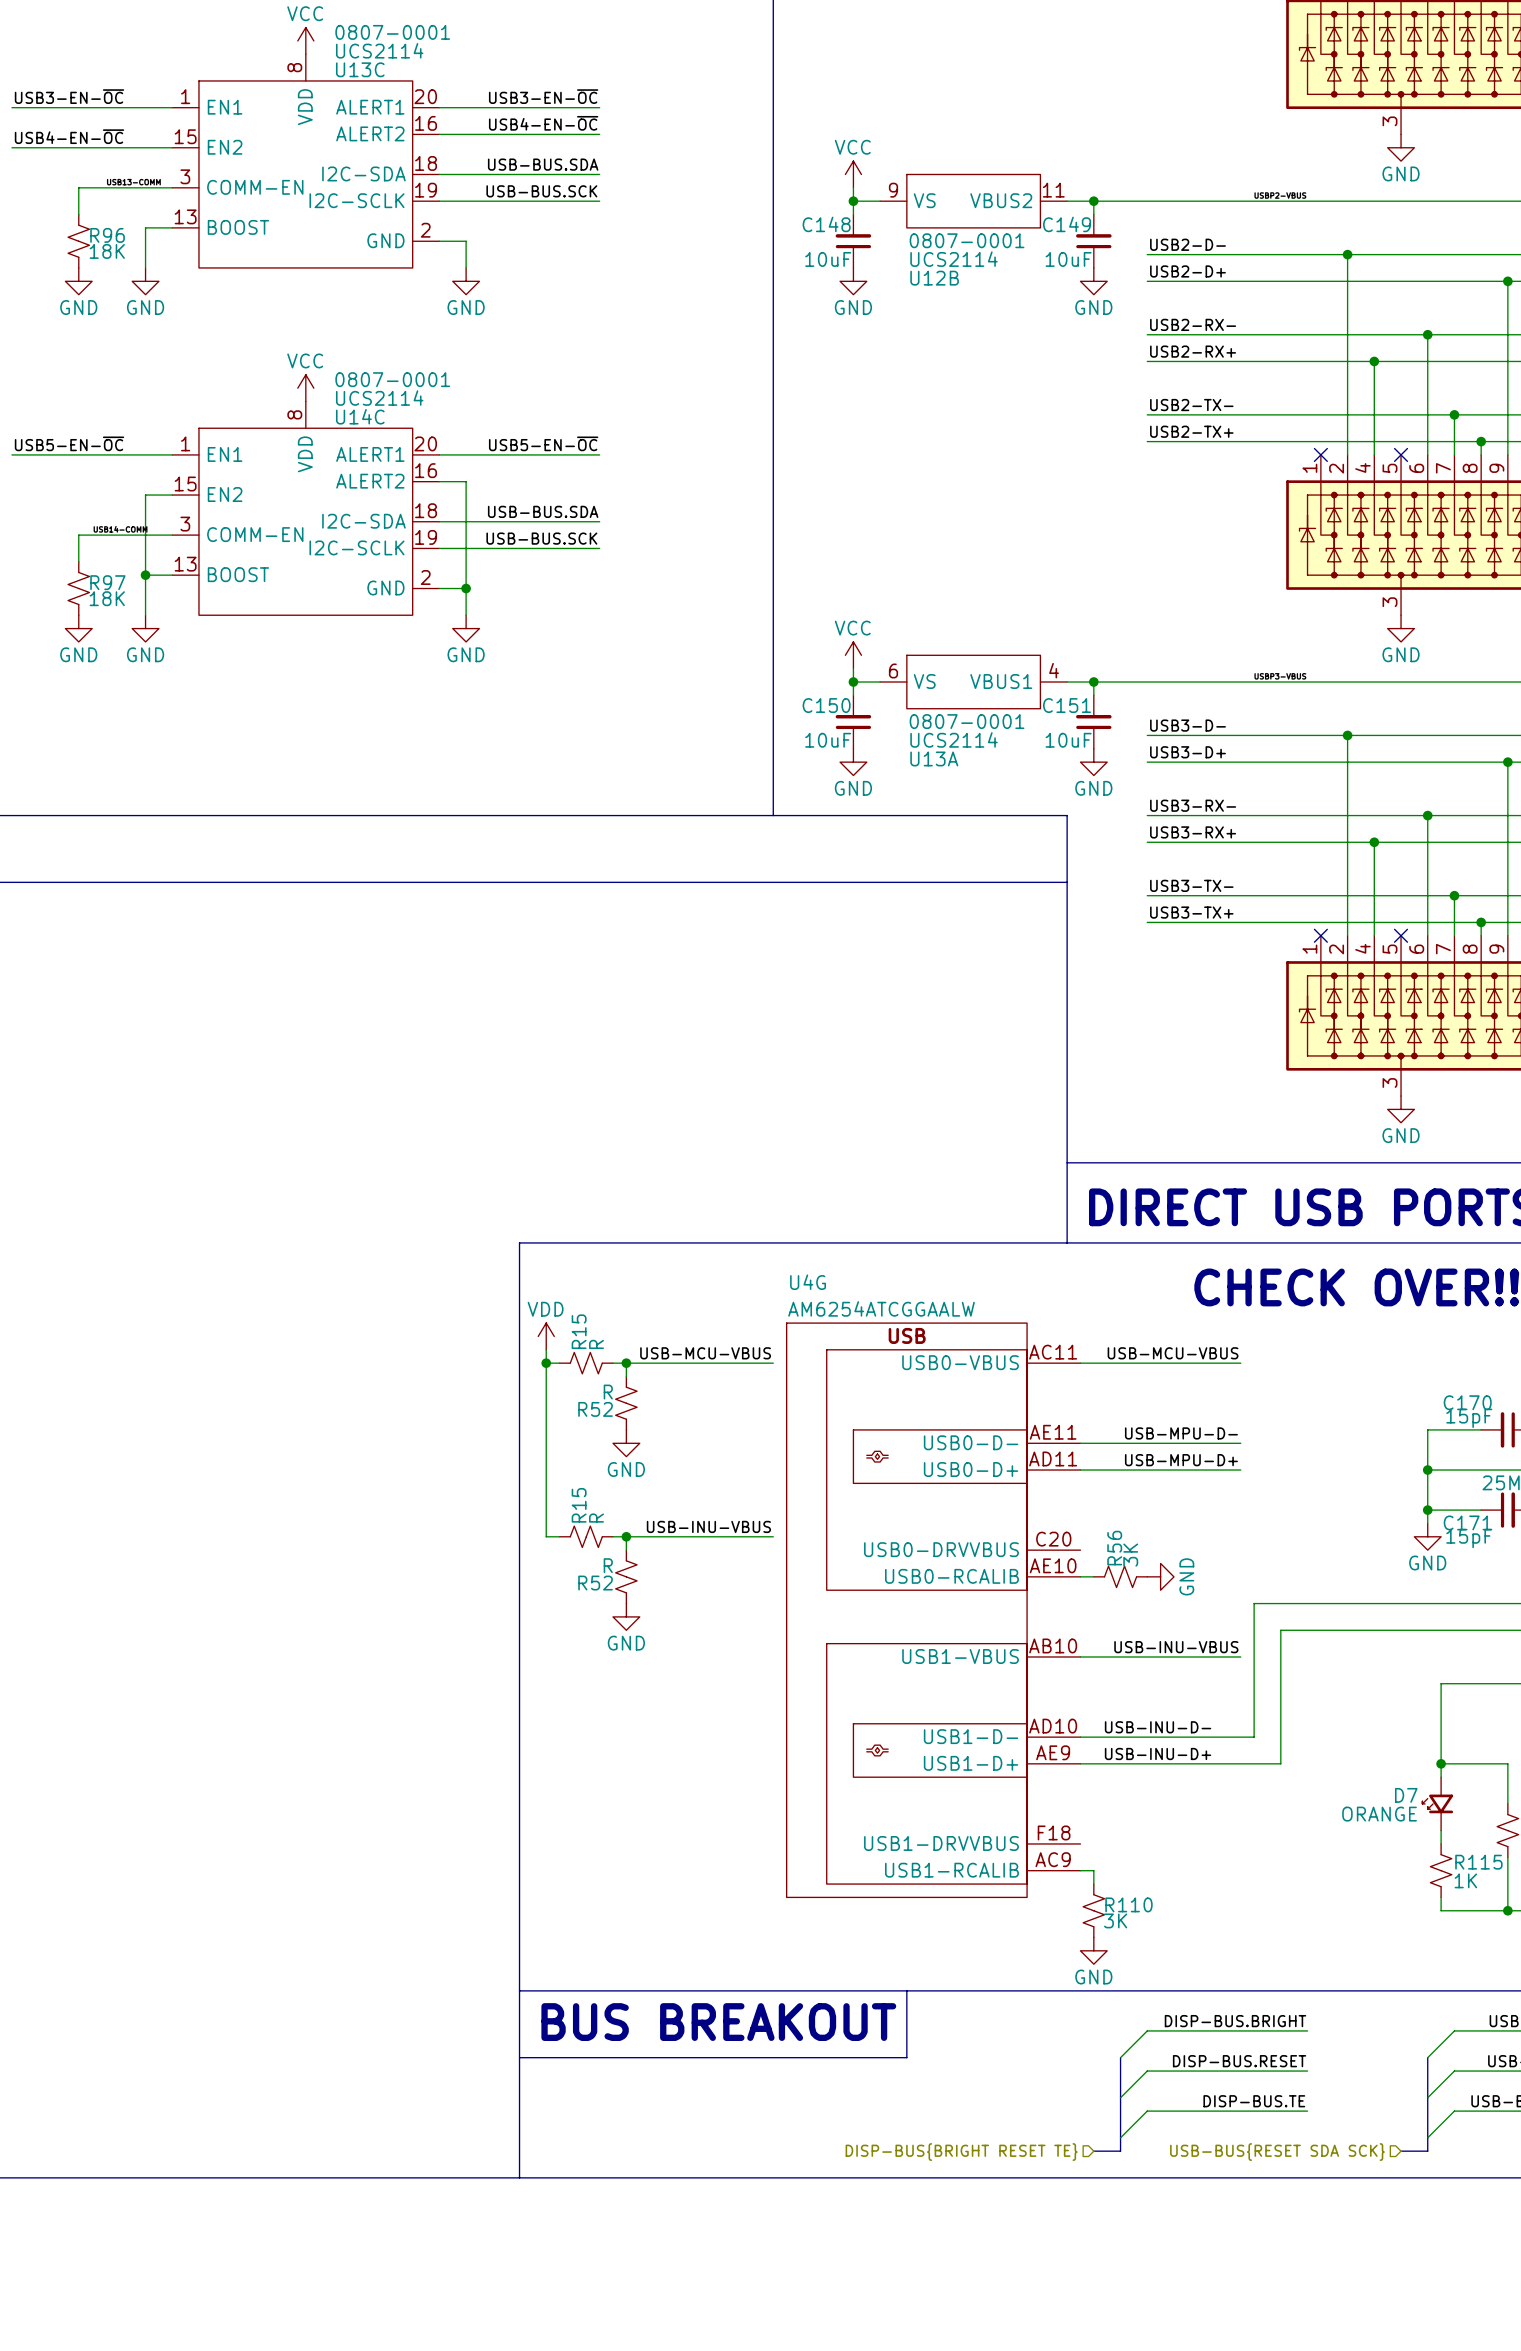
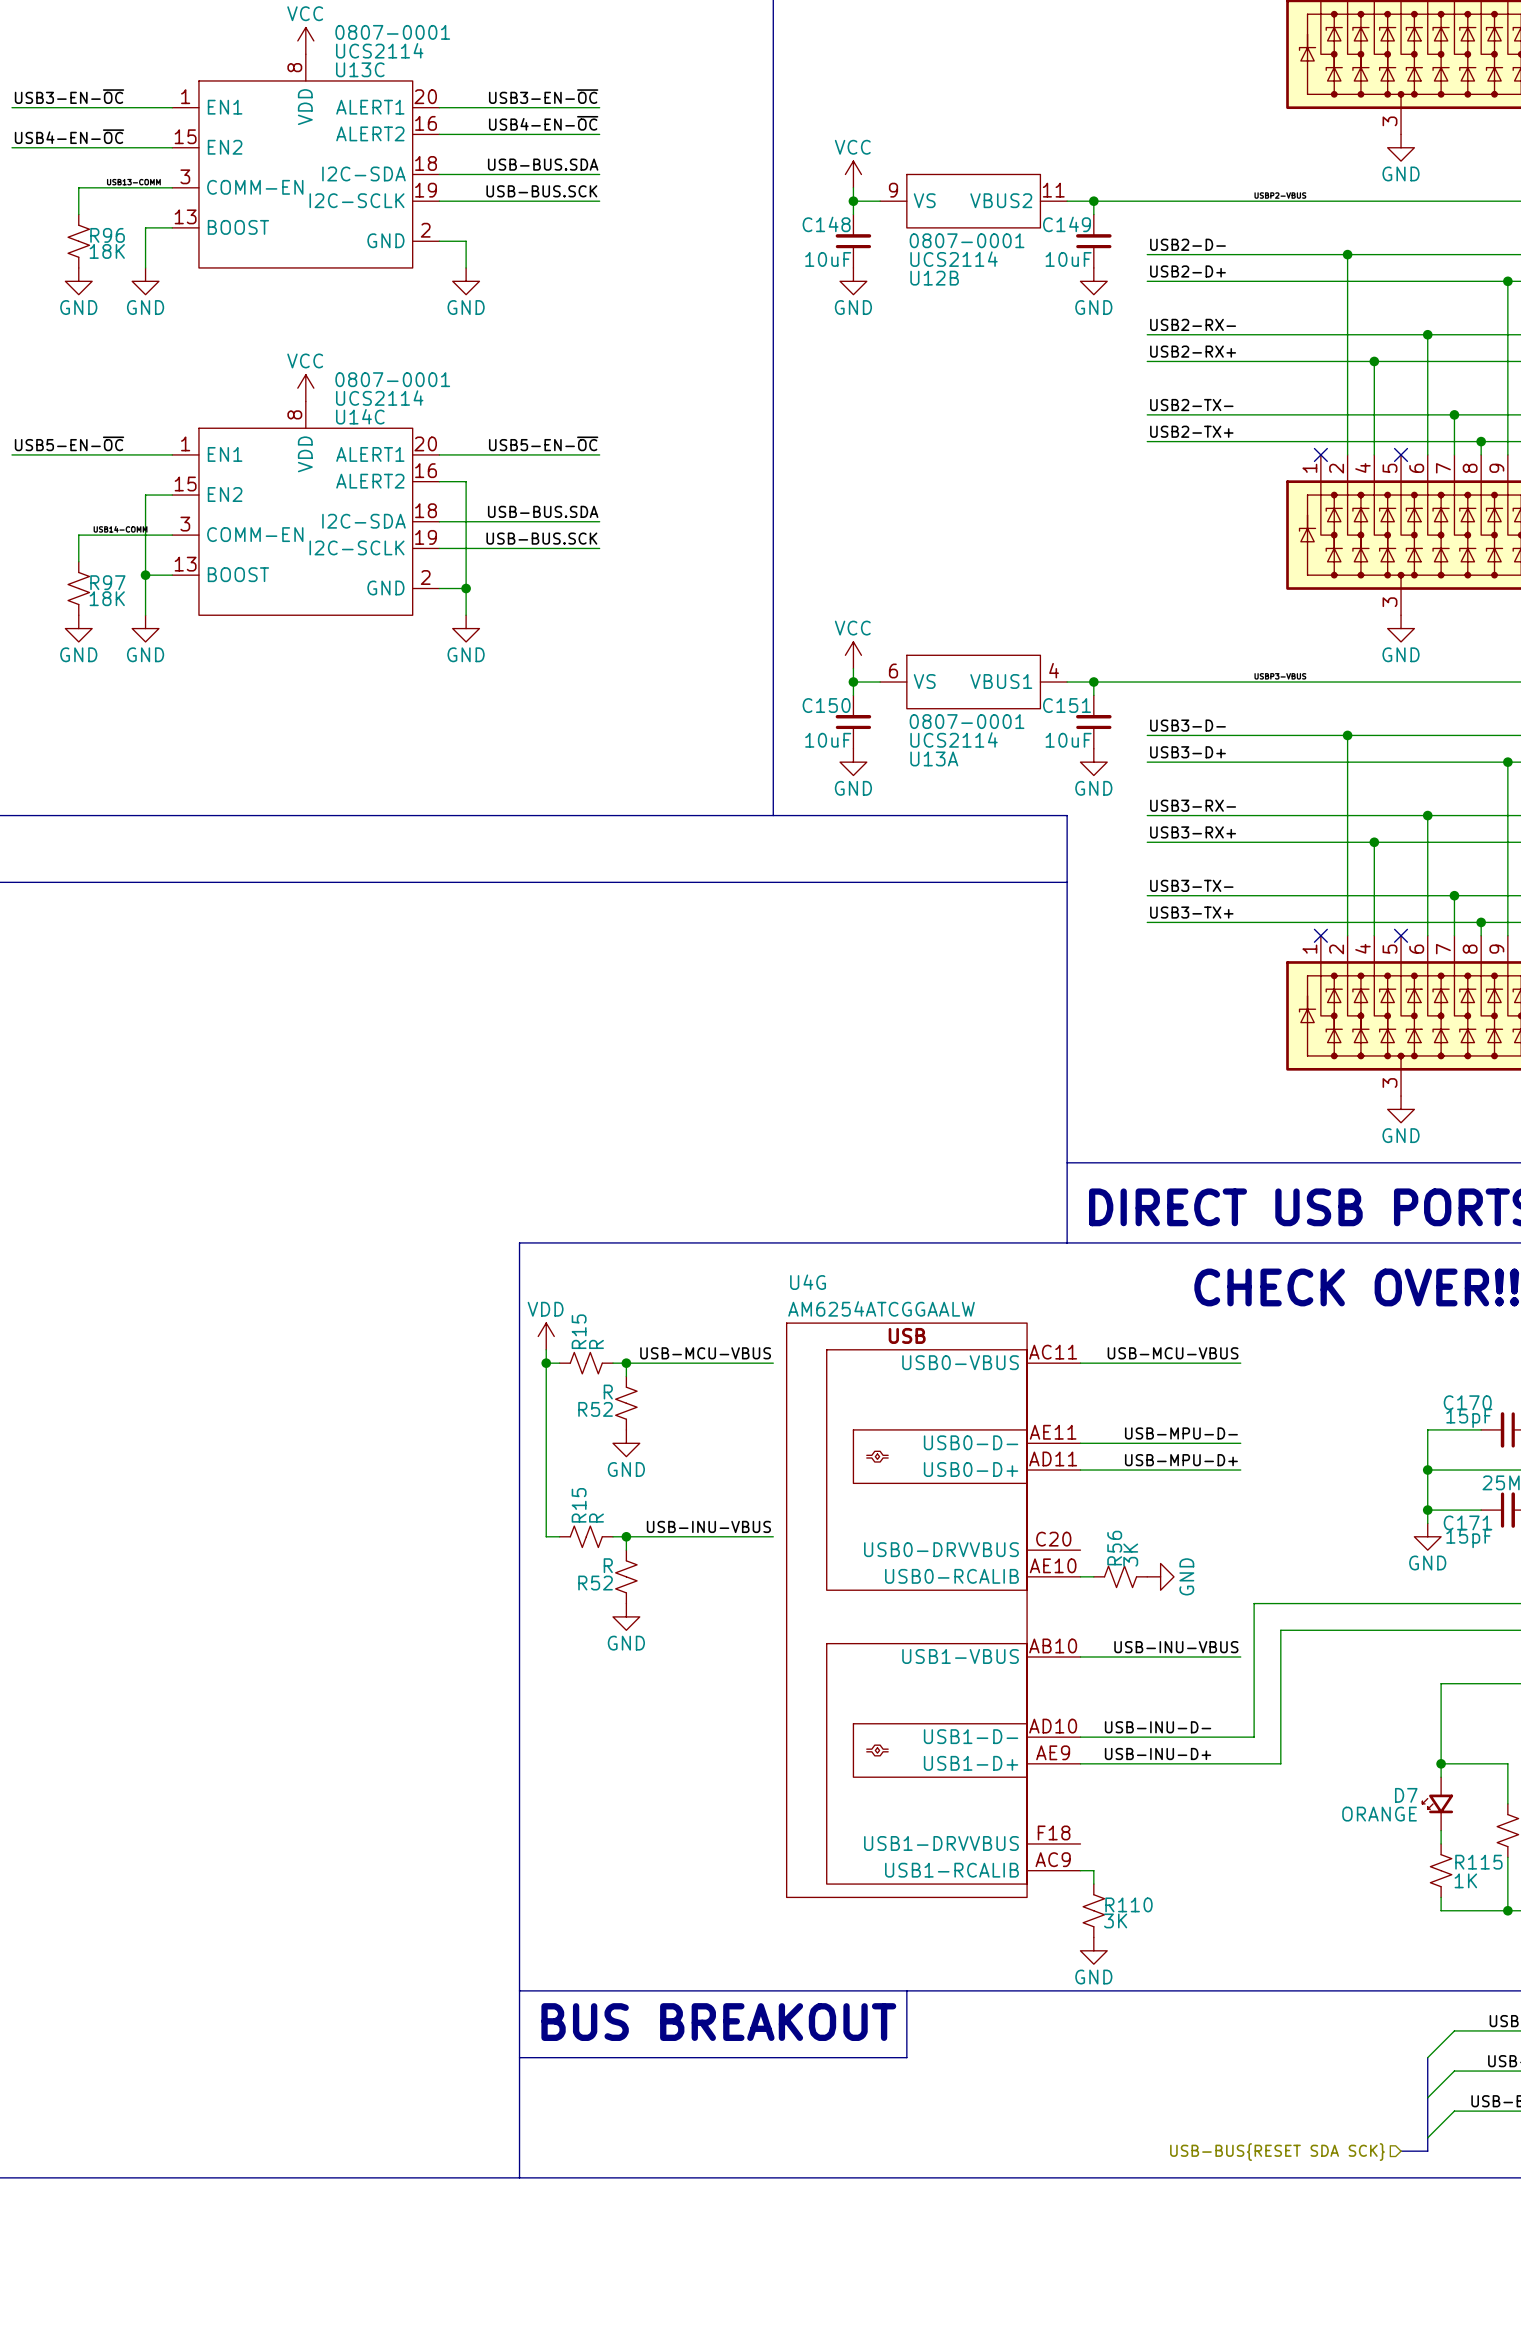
label: DISP-BUS.BRIGHT (1235, 2021) -> none
wire: (1307, 2030) (1147, 2030) (1120, 2057) -> none
bus: (1120, 2057) (1120, 2151) (1093, 2151) -> none
label: DISP-BUS.RESET (1239, 2061) -> none
wire: (1307, 2071) (1147, 2071) (1120, 2097) -> none
label: DISP-BUS.TE (1254, 2101) -> none
wire: (1307, 2111) (1147, 2111) (1120, 2137) -> none
hierarchical label: DISP-BUS{BRIGHT RESET TE} (961, 2152) -> none

